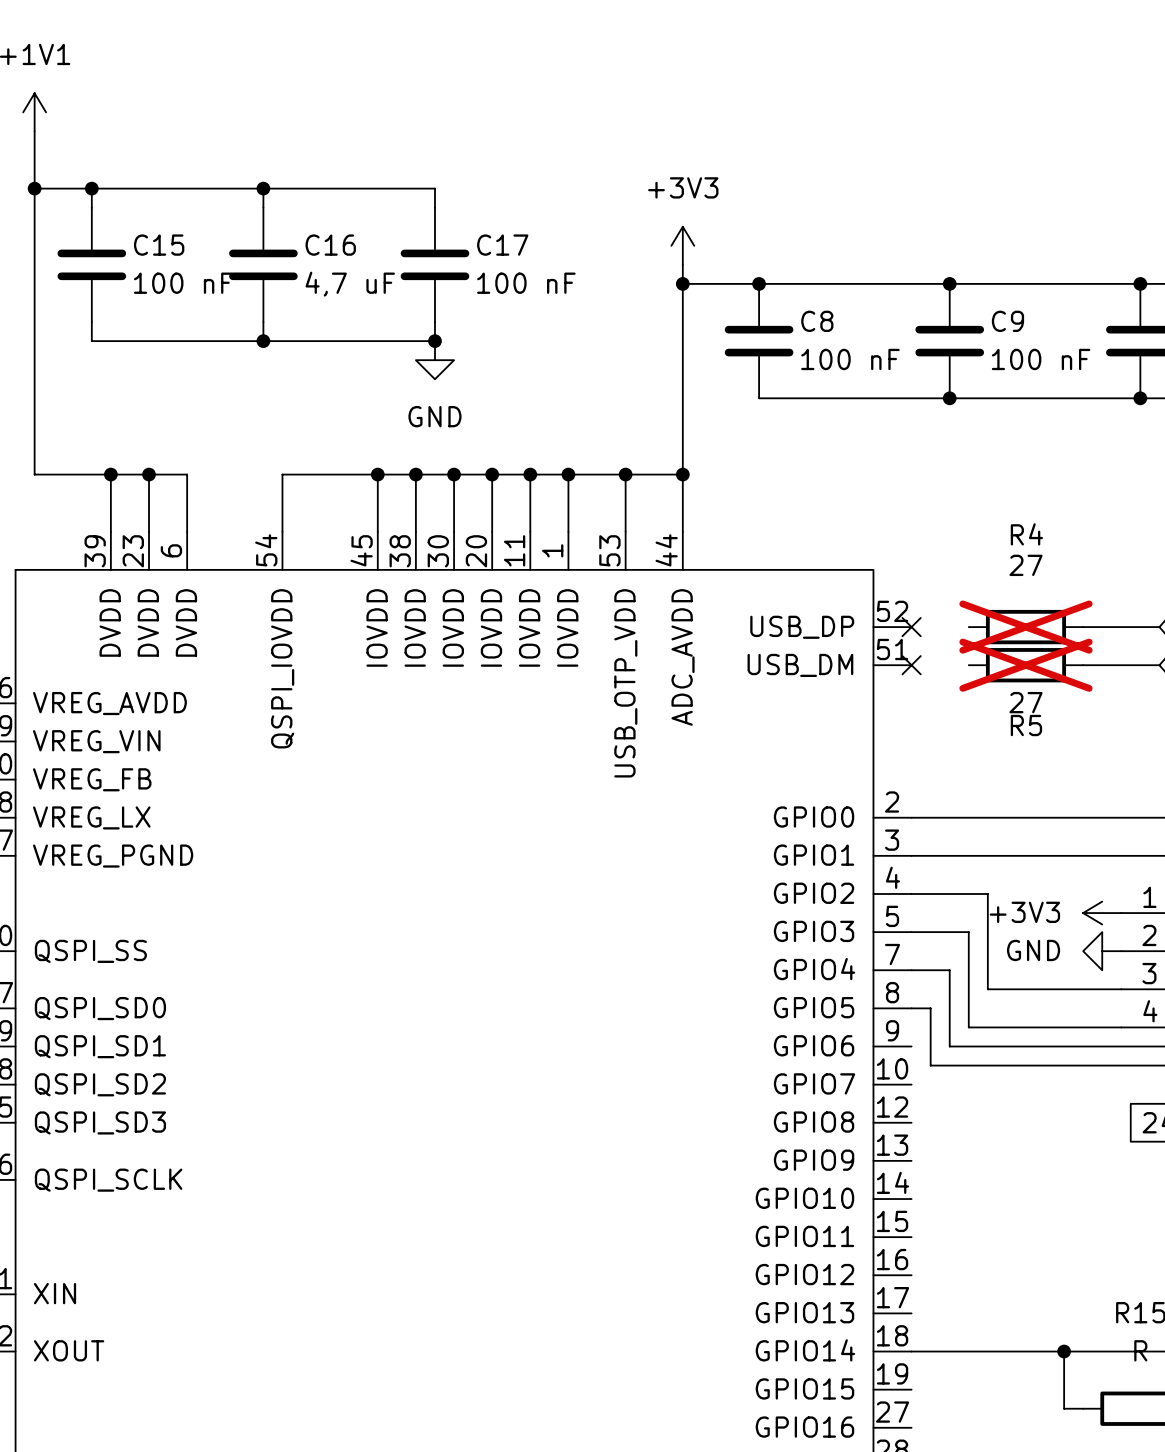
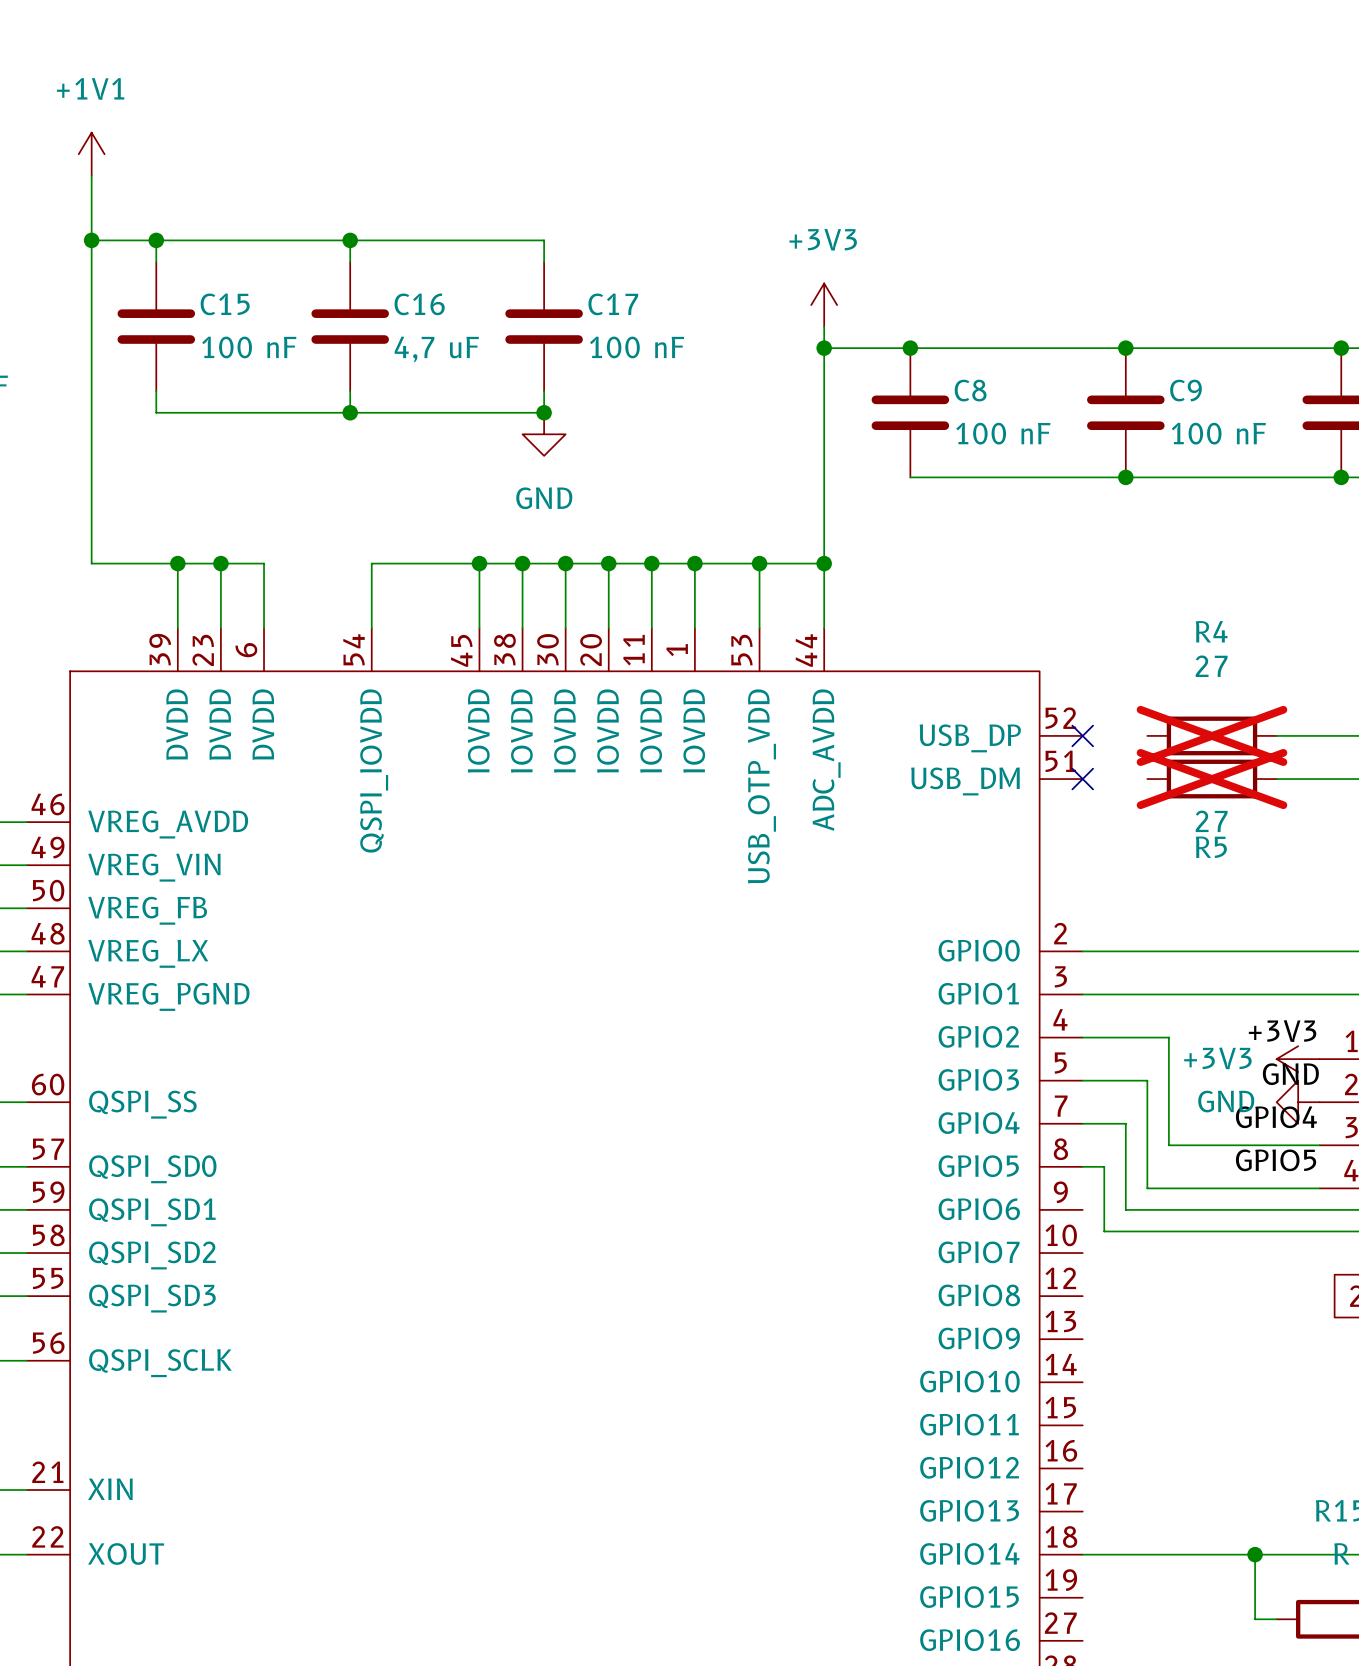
label: none -> +3V3 (1282, 1031)
label: none -> GND (1290, 1074)
label: none -> GPIO4 (1276, 1117)
label: none -> GPIO5 (1276, 1160)

